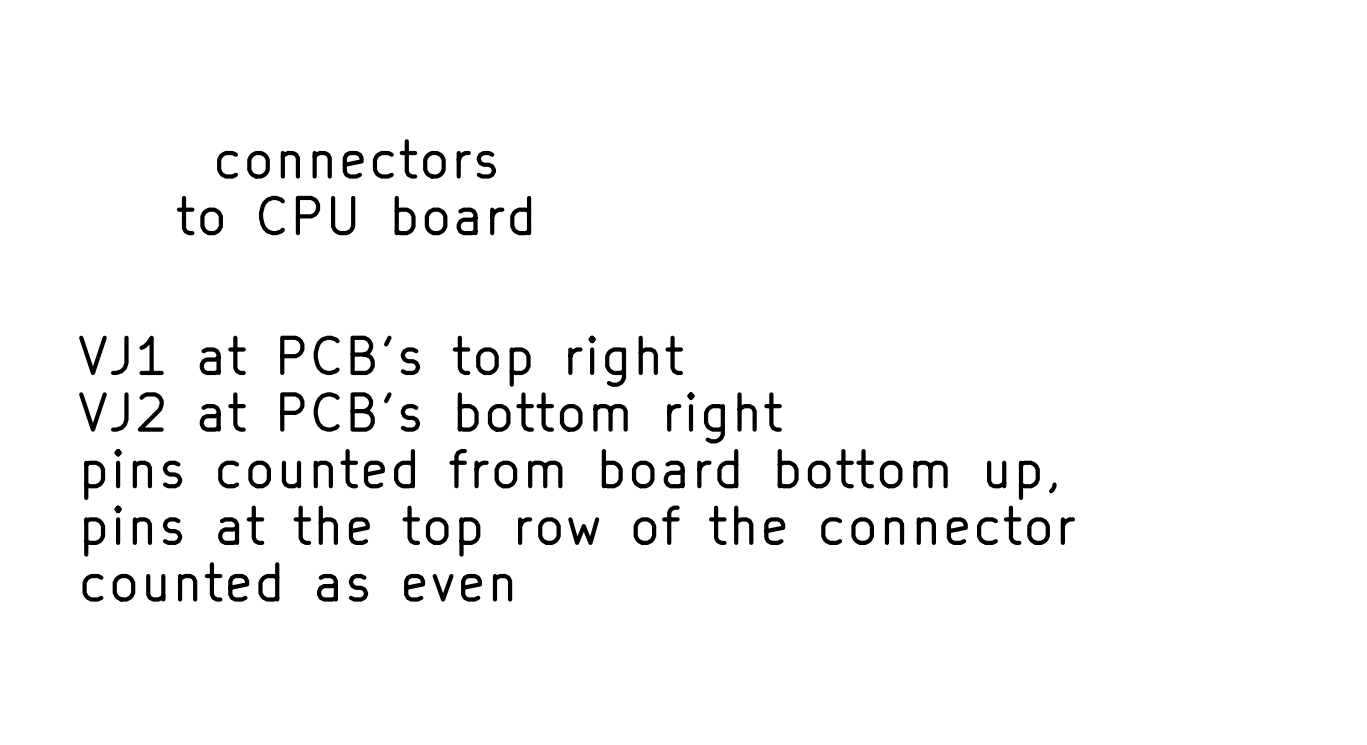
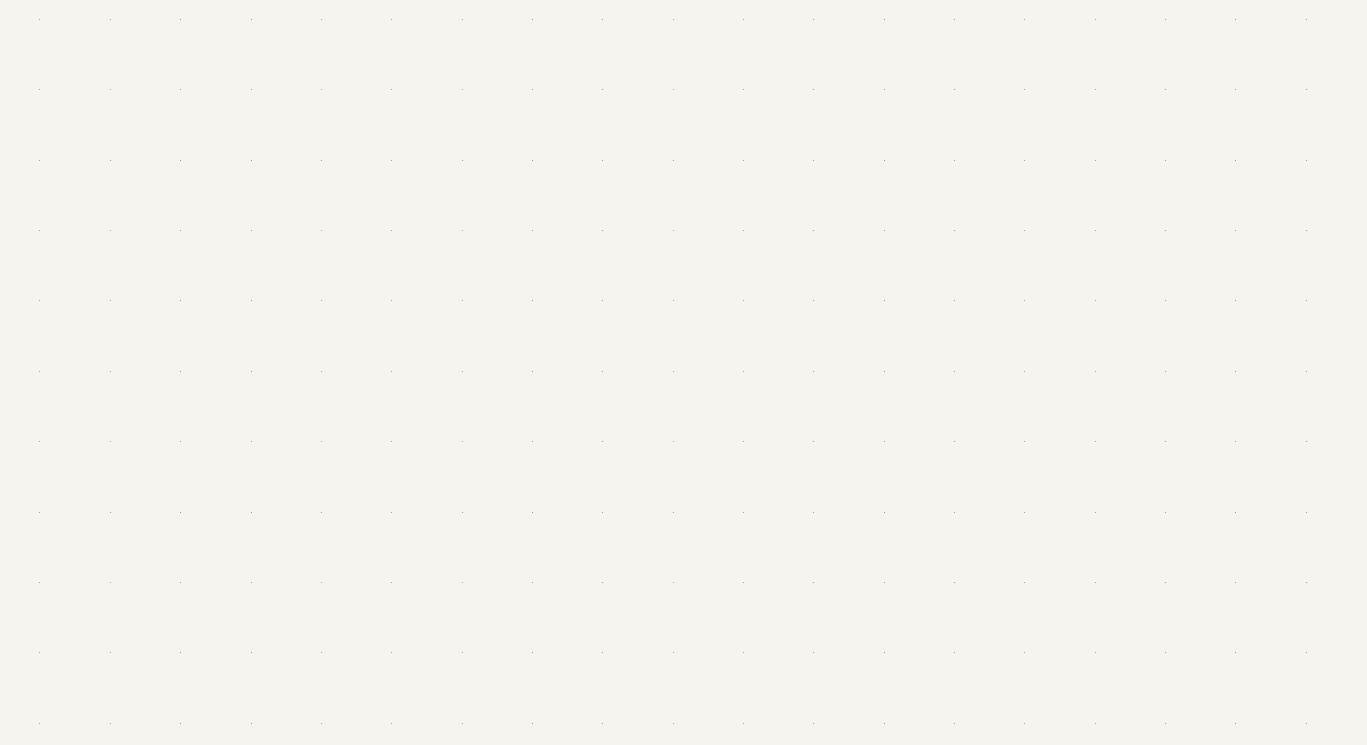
text: connectors (356, 158) -> none
text: to CPU board (354, 215) -> none
text: VJ1 at PCB's top right (381, 361) -> none
text: VJ2 at PCB's bottom right (430, 417) -> none
text: pins counted from board bottom up, (570, 474) -> none
text: pins at the top row of the connector (579, 531) -> none
text: counted as even (297, 581) -> none

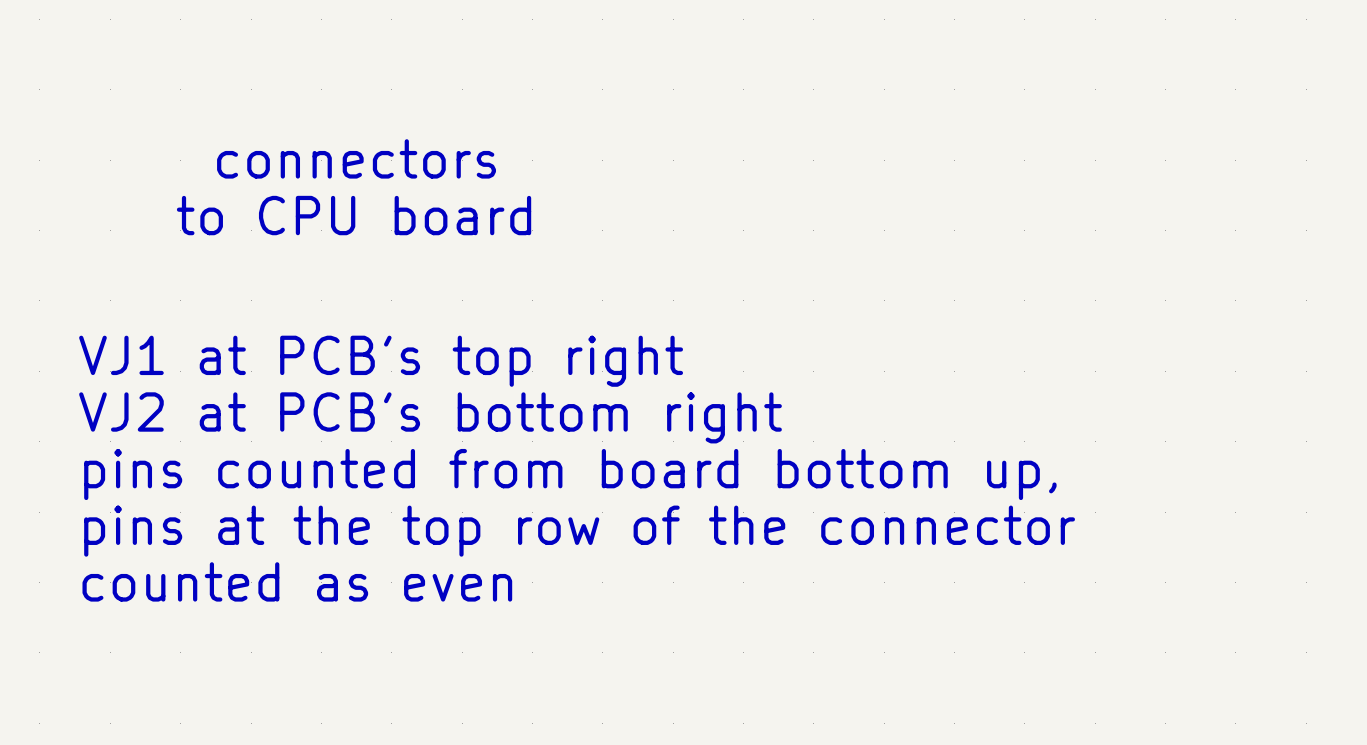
text: none -> connectors (356, 158)
text: none -> to CPU board (354, 215)
text: none -> VJ1 at PCB's top right (381, 361)
text: none -> VJ2 at PCB's bottom right (430, 417)
text: none -> pins counted from board bottom up, (570, 474)
text: none -> pins at the top row of the connector (579, 531)
text: none -> counted as even (297, 581)

